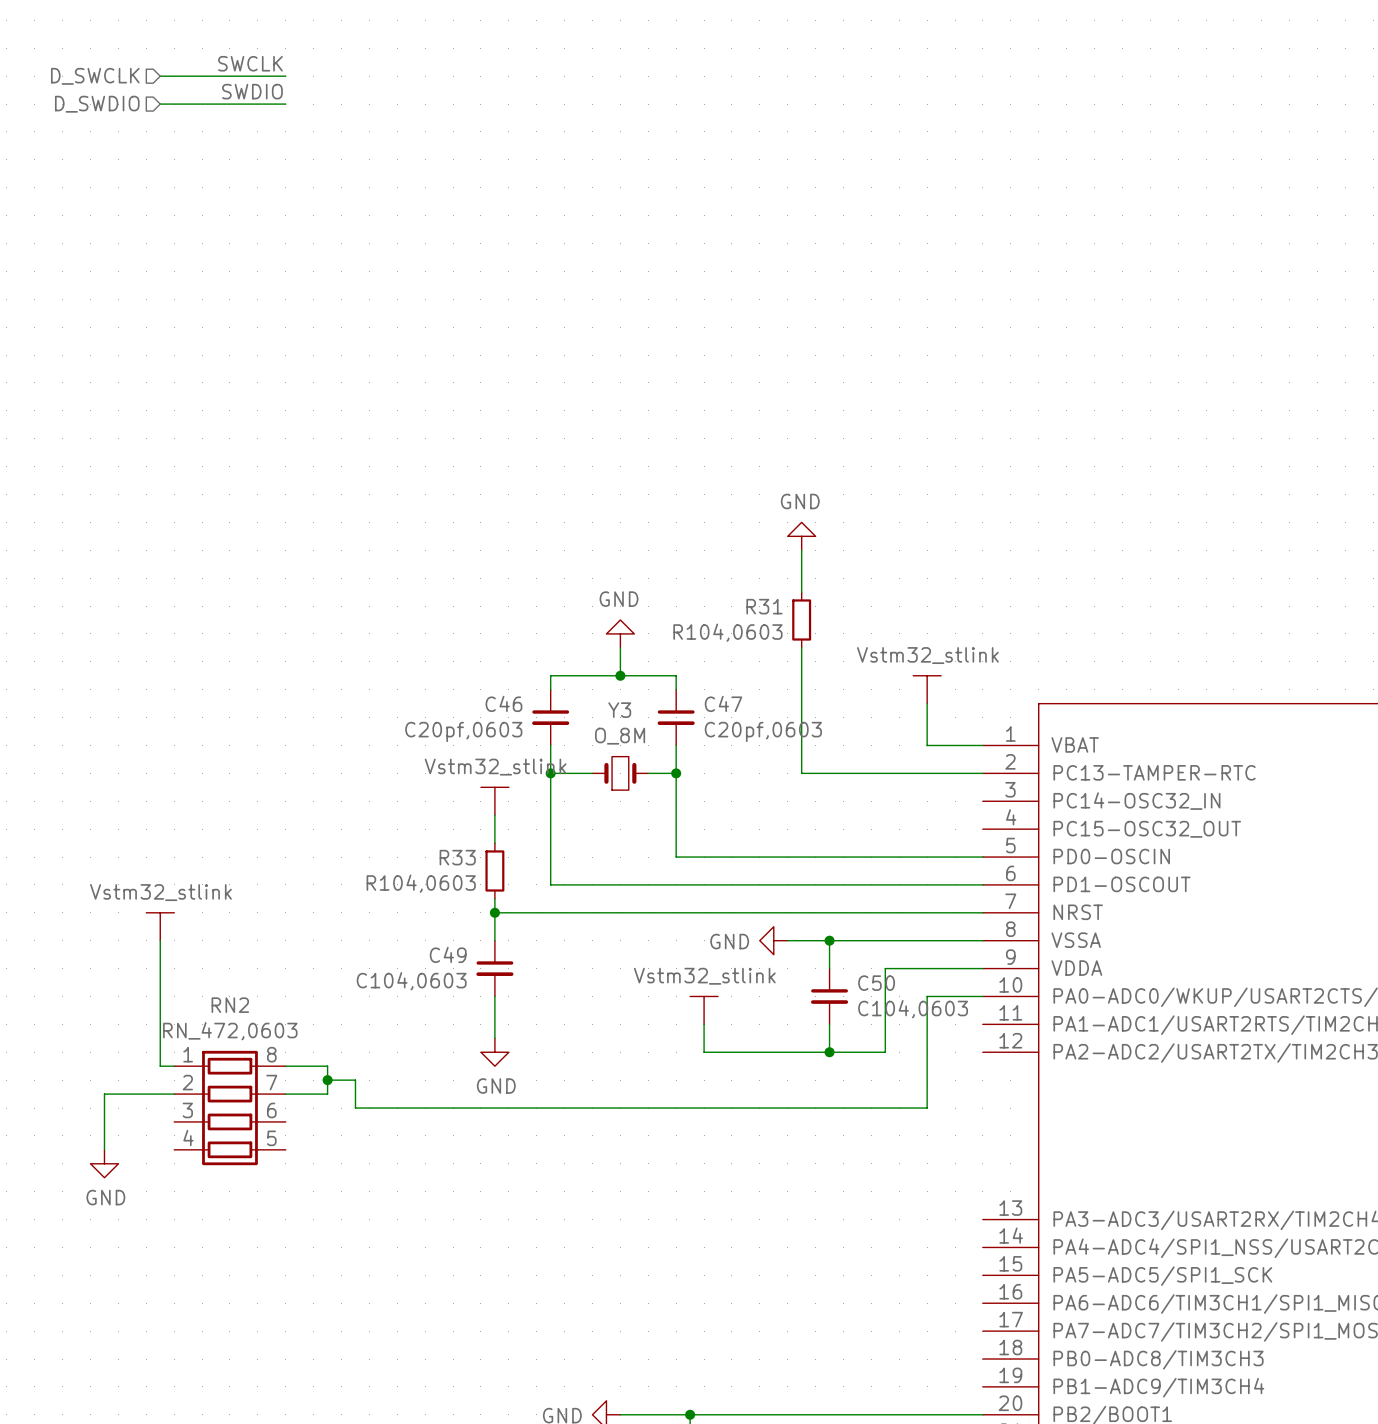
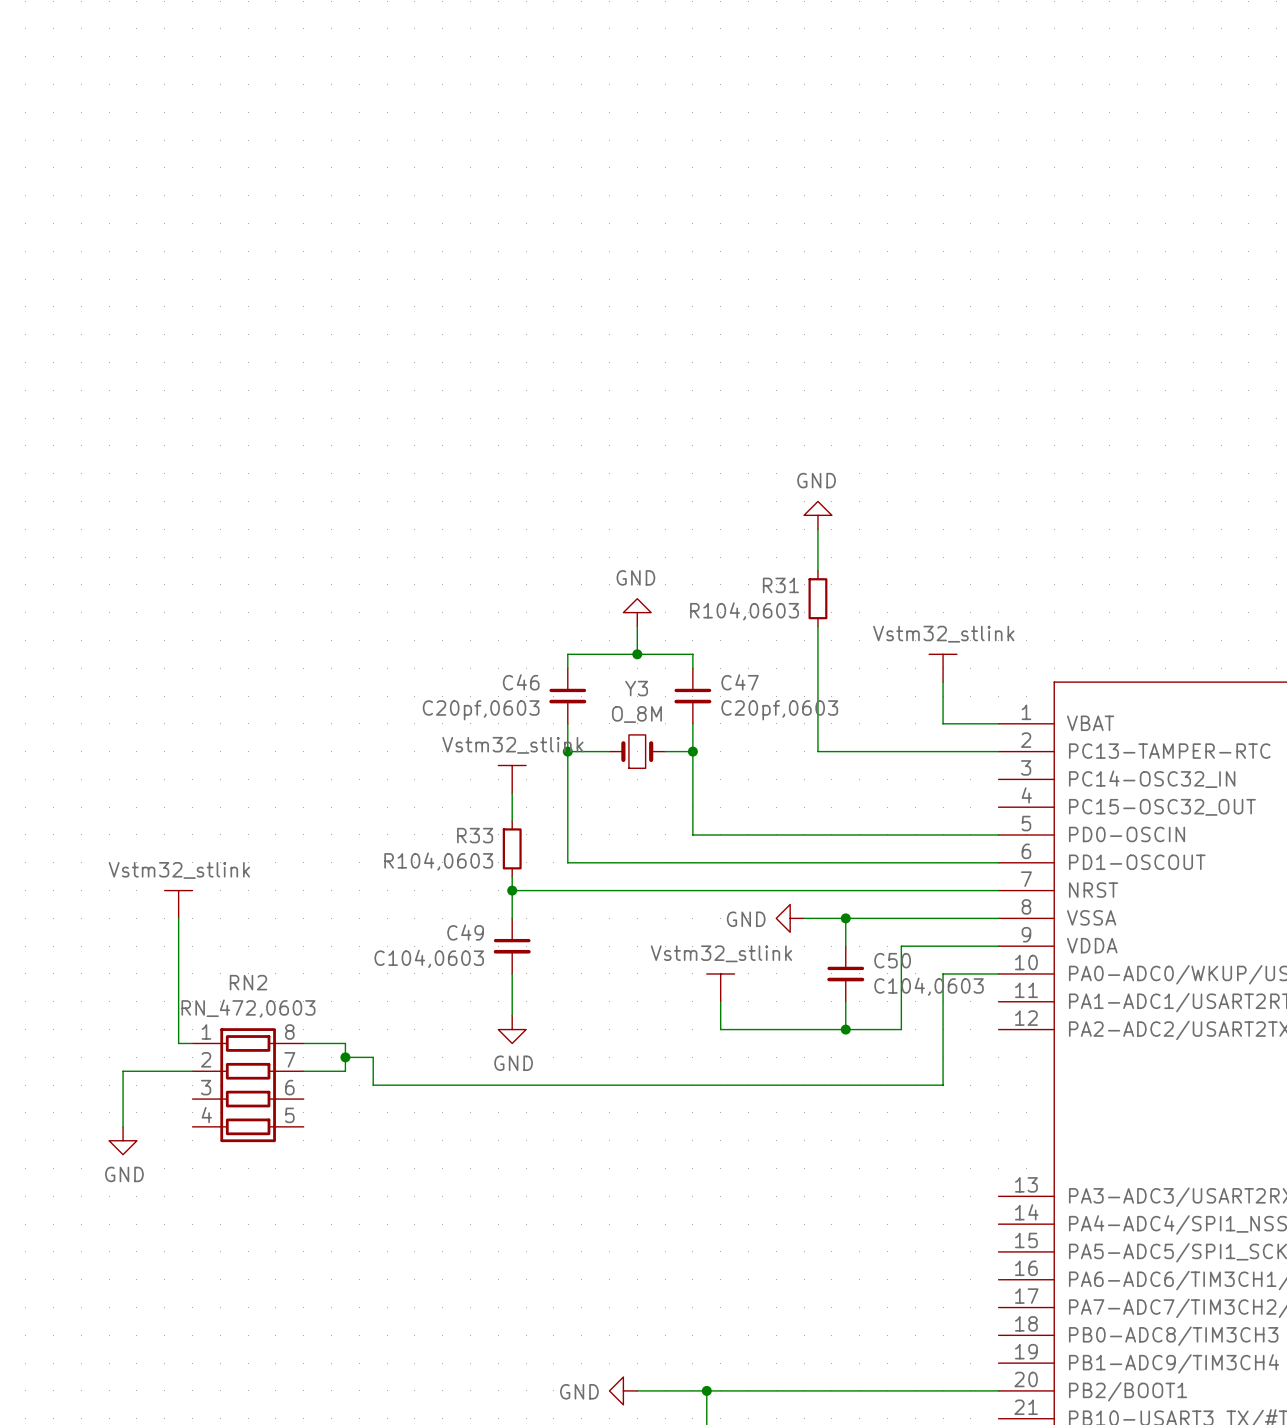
label: SWCLK (250, 63) -> none
hierarchical label: D_SWCLK (95, 76) -> none
wire: (160, 76) (285, 76) -> none
label: SWDIO (252, 91) -> none
hierarchical label: D_SWDIO (97, 104) -> none
wire: (160, 104) (285, 104) -> none

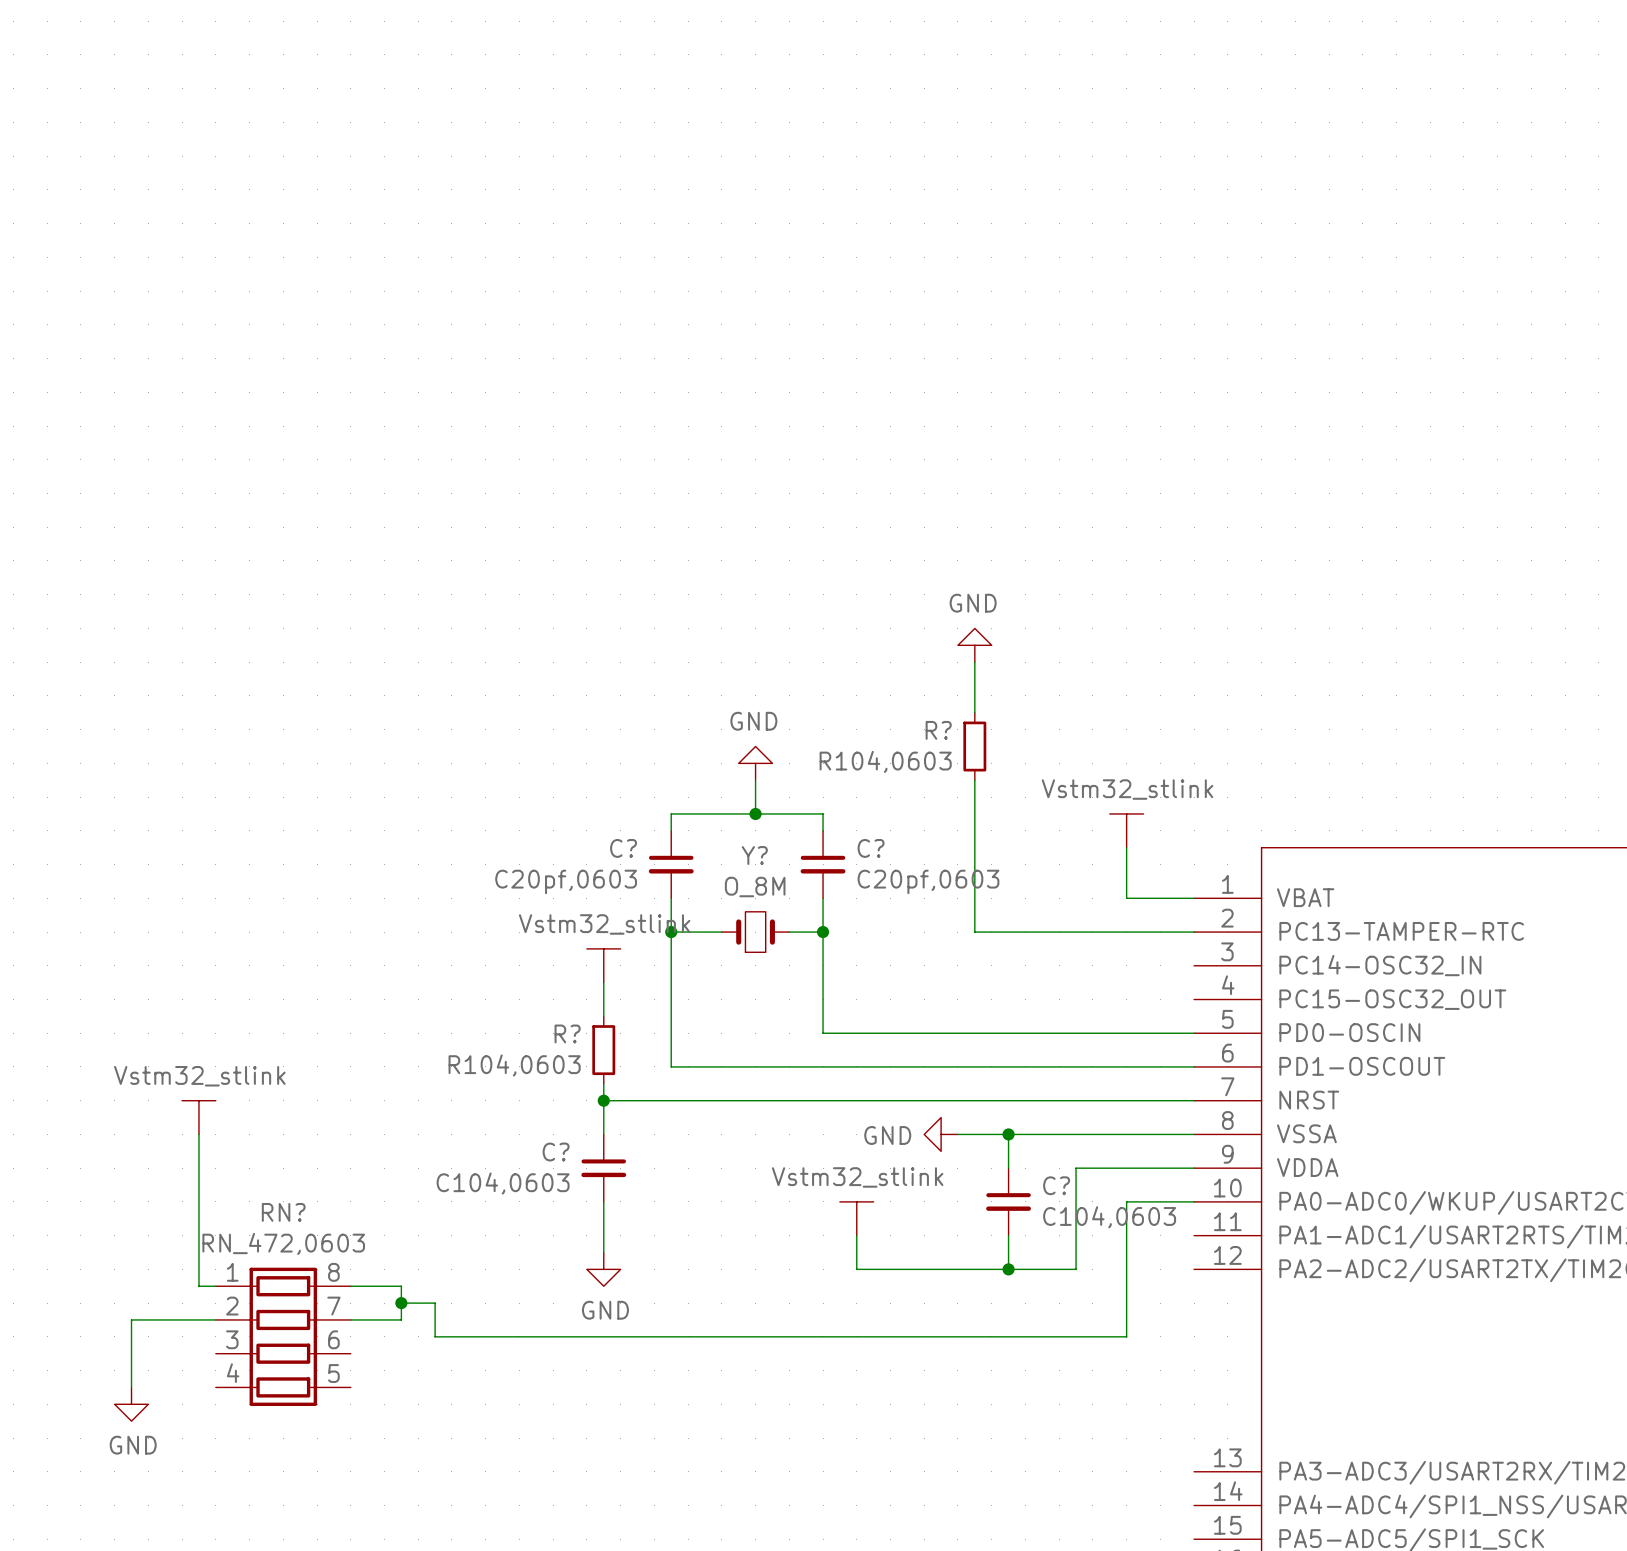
R31 name: R31 (780, 585) -> R? (938, 730)
C46 name: C46 (521, 682) -> C? (623, 848)
C47 name: C47 (740, 682) -> C? (871, 848)
Y3 name: Y3 (636, 688) -> Y? (754, 855)
R33 name: R33 (475, 835) -> R? (567, 1033)
C49 name: C49 (465, 932) -> C? (556, 1152)
C50 name: C50 (892, 960) -> C? (1056, 1185)
RN2 name: RN2 (248, 982) -> RN? (283, 1212)

